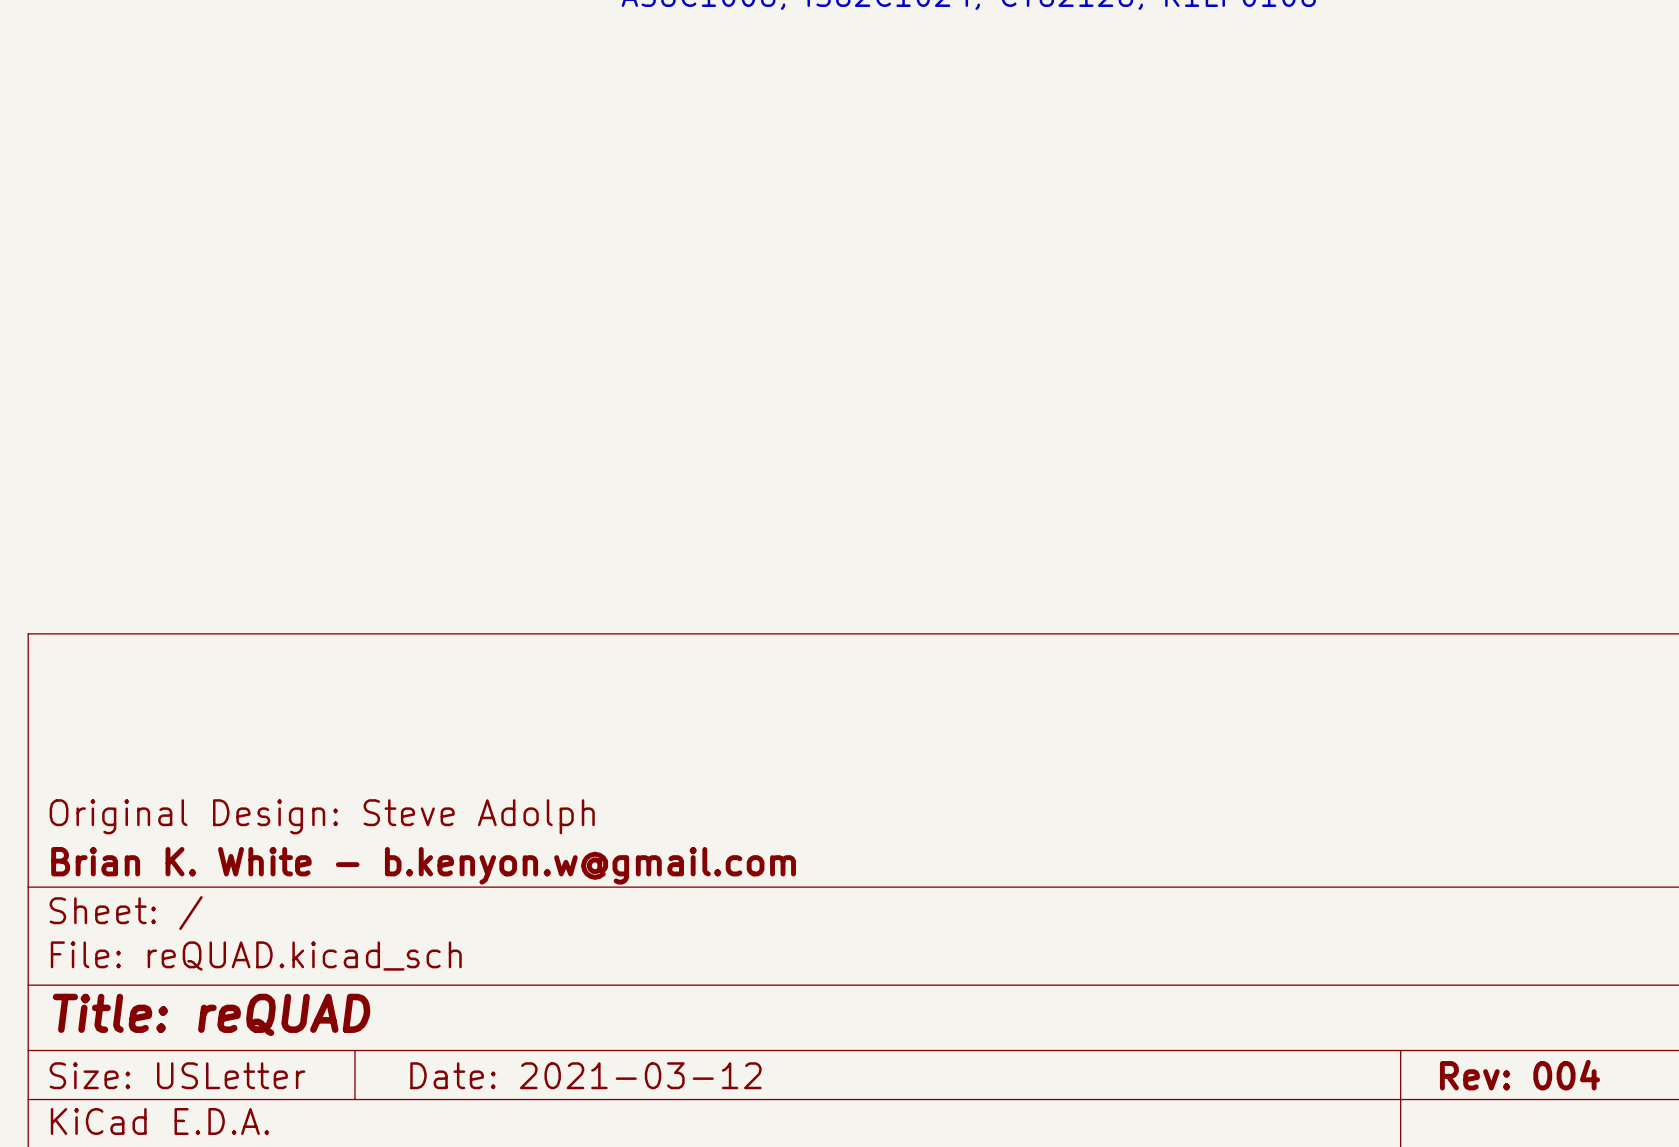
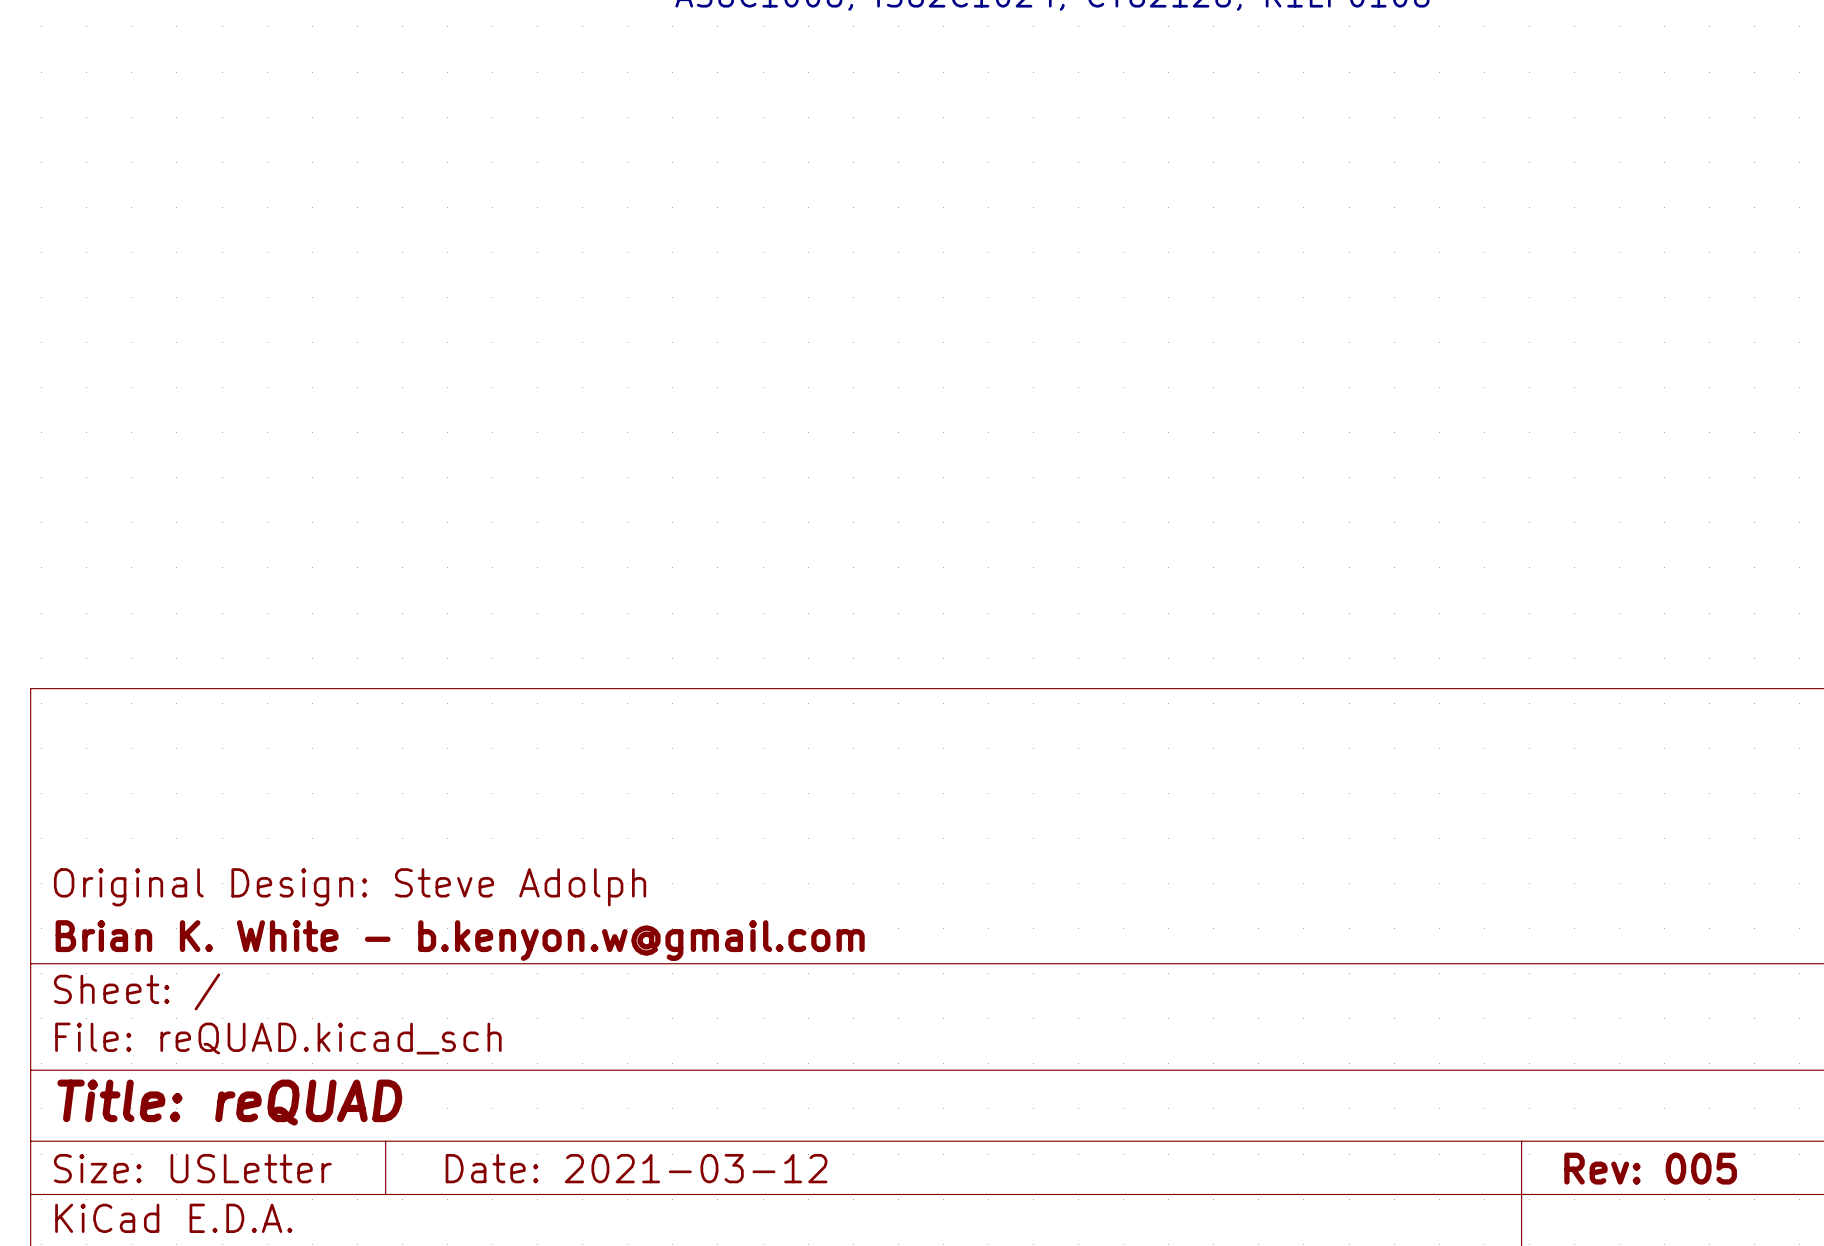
title block: Rev: 004 (1519, 1075) -> Rev: 005 (1650, 1168)

